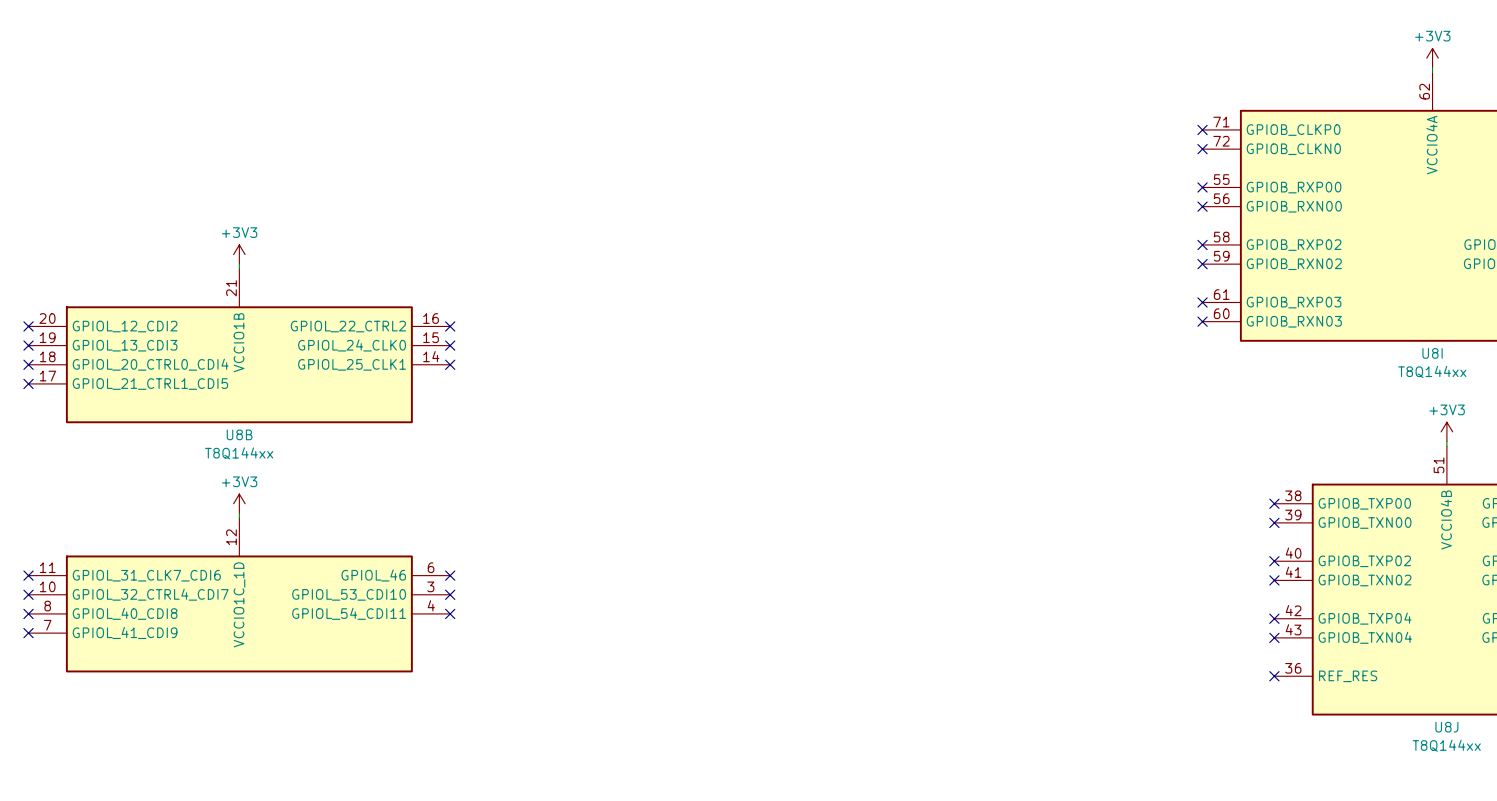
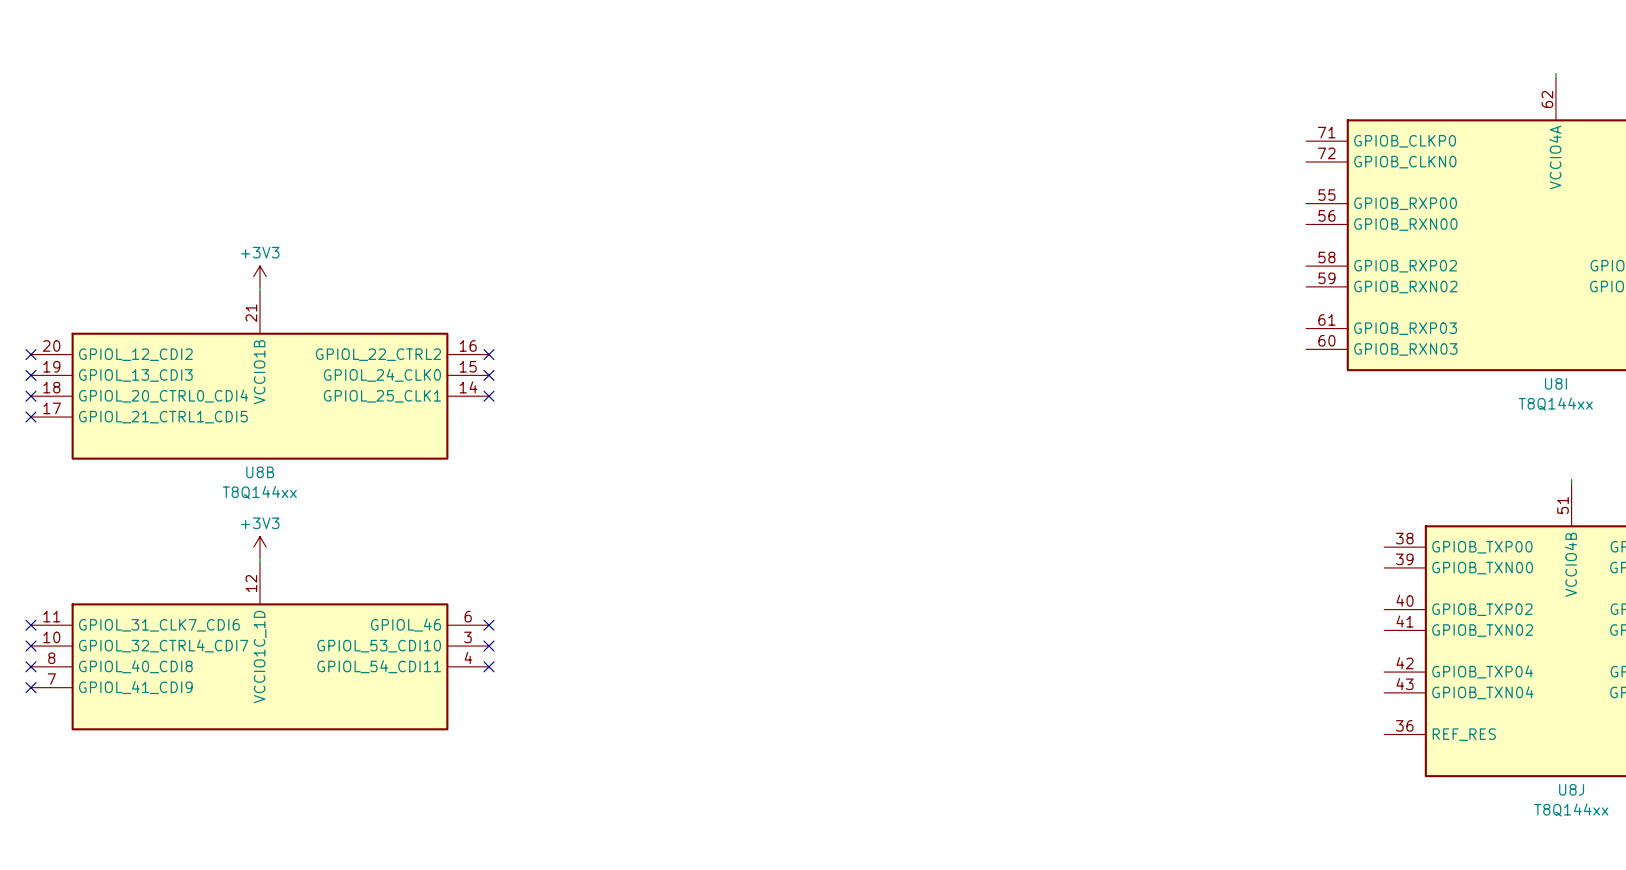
power symbol: +3V3 (1432, 58) -> none
no-connect mark: (1202, 129) -> none
no-connect mark: (1202, 149) -> none
no-connect mark: (1202, 187) -> none
no-connect mark: (1202, 206) -> none
no-connect mark: (1202, 244) -> none
no-connect mark: (1202, 264) -> none
no-connect mark: (1202, 302) -> none
no-connect mark: (1202, 321) -> none
power symbol: +3V3 (1446, 431) -> none
no-connect mark: (1274, 503) -> none
no-connect mark: (1274, 522) -> none
no-connect mark: (1274, 561) -> none
no-connect mark: (1274, 580) -> none
no-connect mark: (1274, 618) -> none
no-connect mark: (1274, 637) -> none
no-connect mark: (1274, 676) -> none

